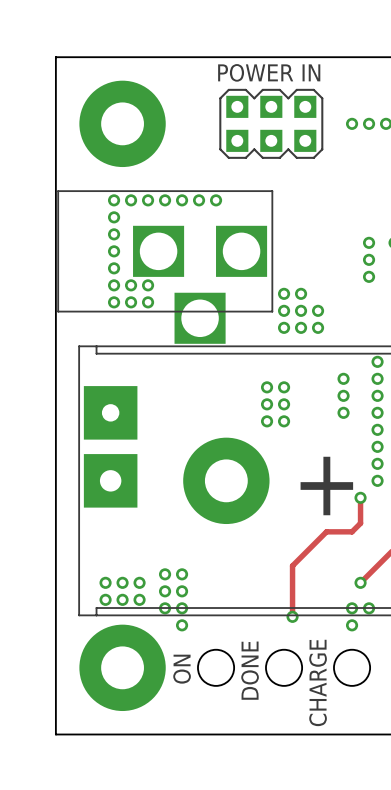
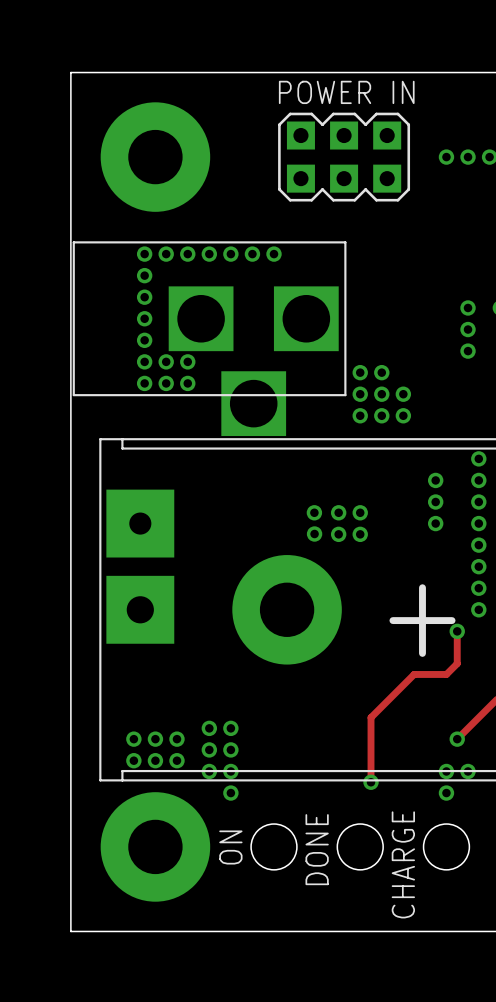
via: (267, 387) -> none
via: (284, 387) -> none
via: none -> (314, 512)
via: none -> (314, 534)

